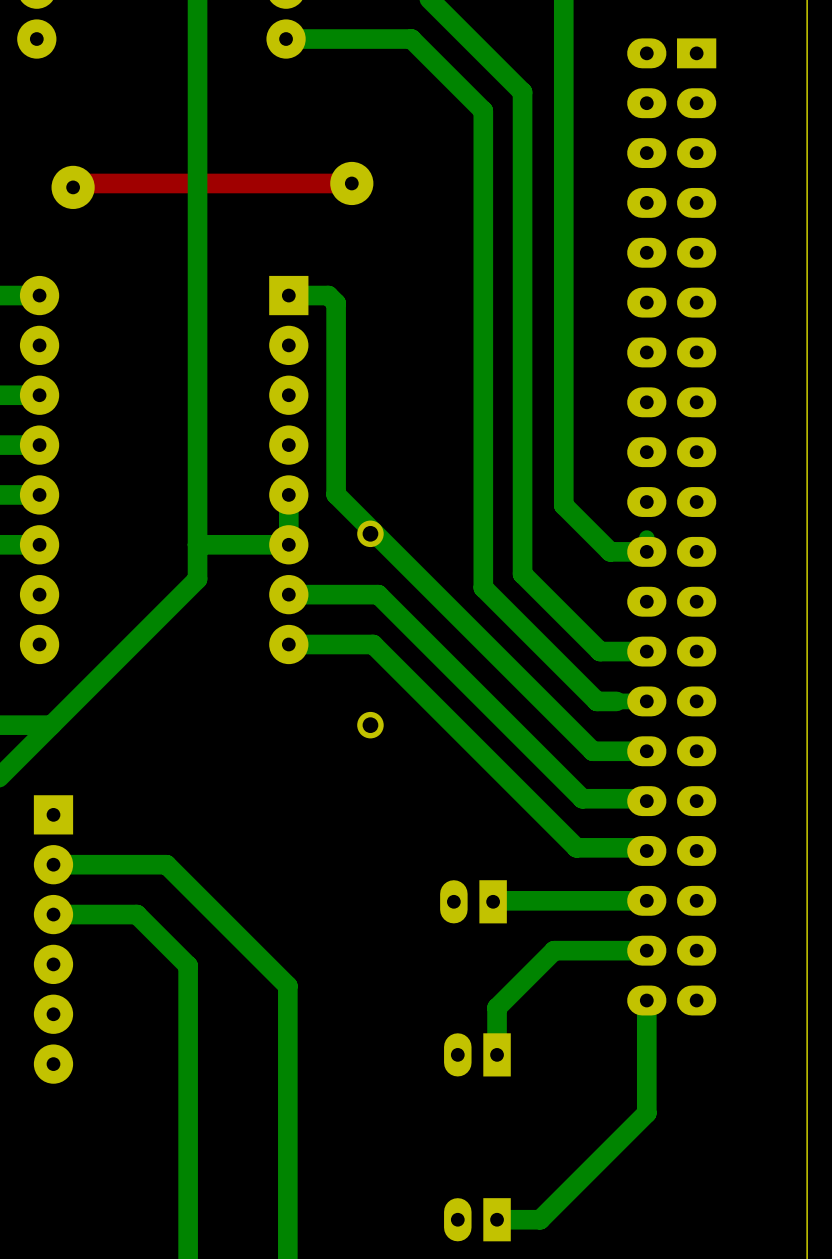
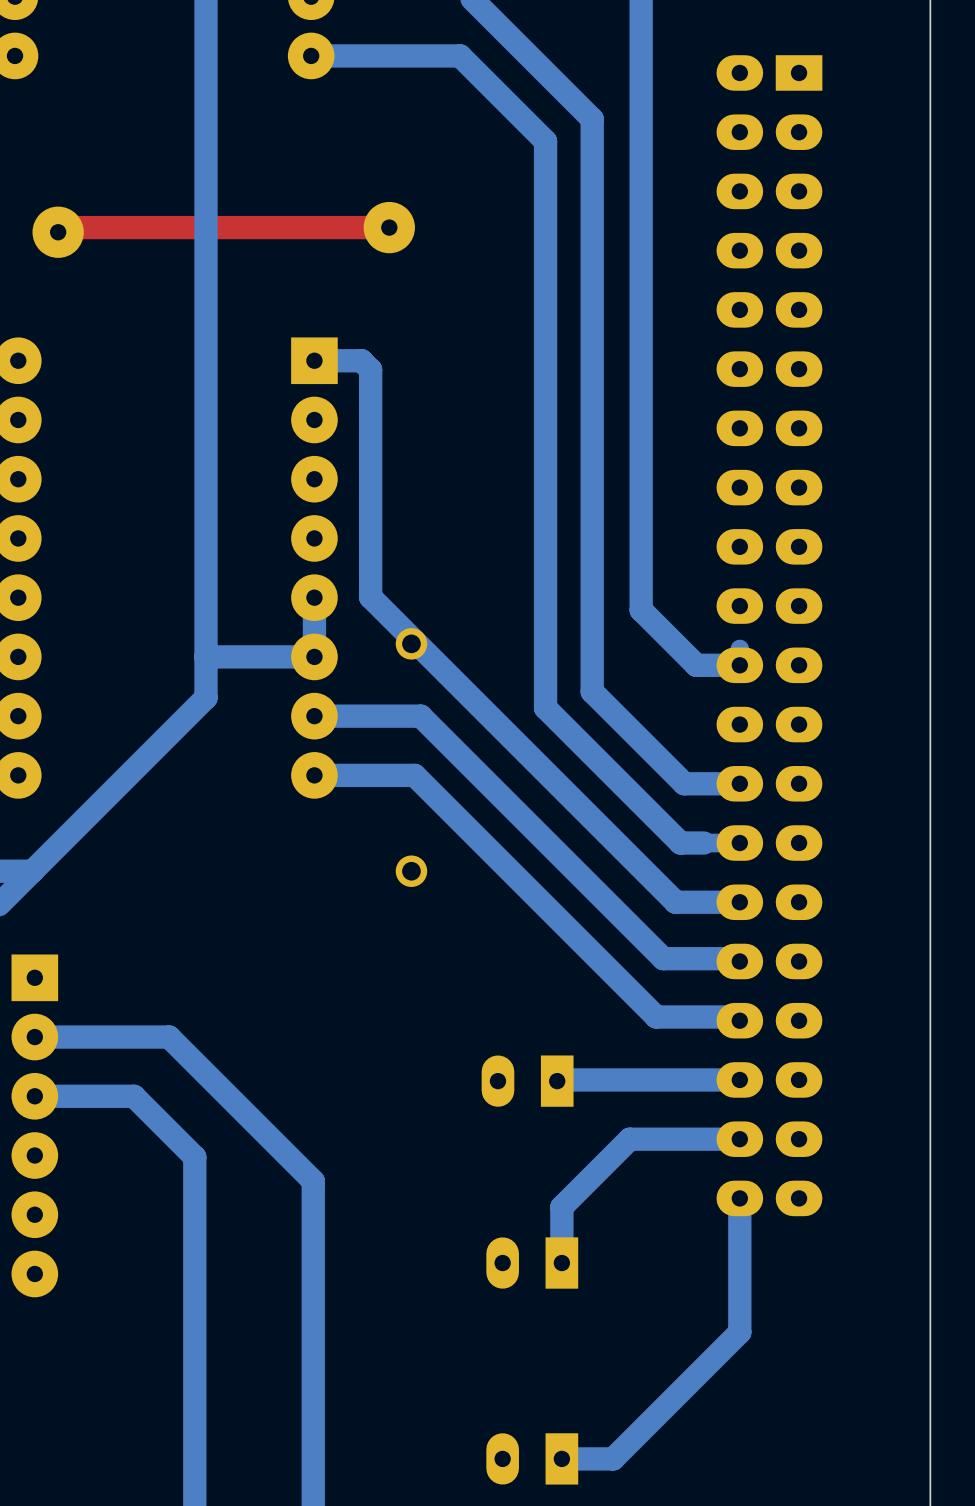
part footprint: [440, 880, 507, 924] -> [481, 1055, 574, 1107]
part footprint: [444, 1033, 511, 1077] -> [486, 1237, 579, 1289]
part footprint: [444, 1198, 511, 1242] -> [486, 1433, 579, 1485]

